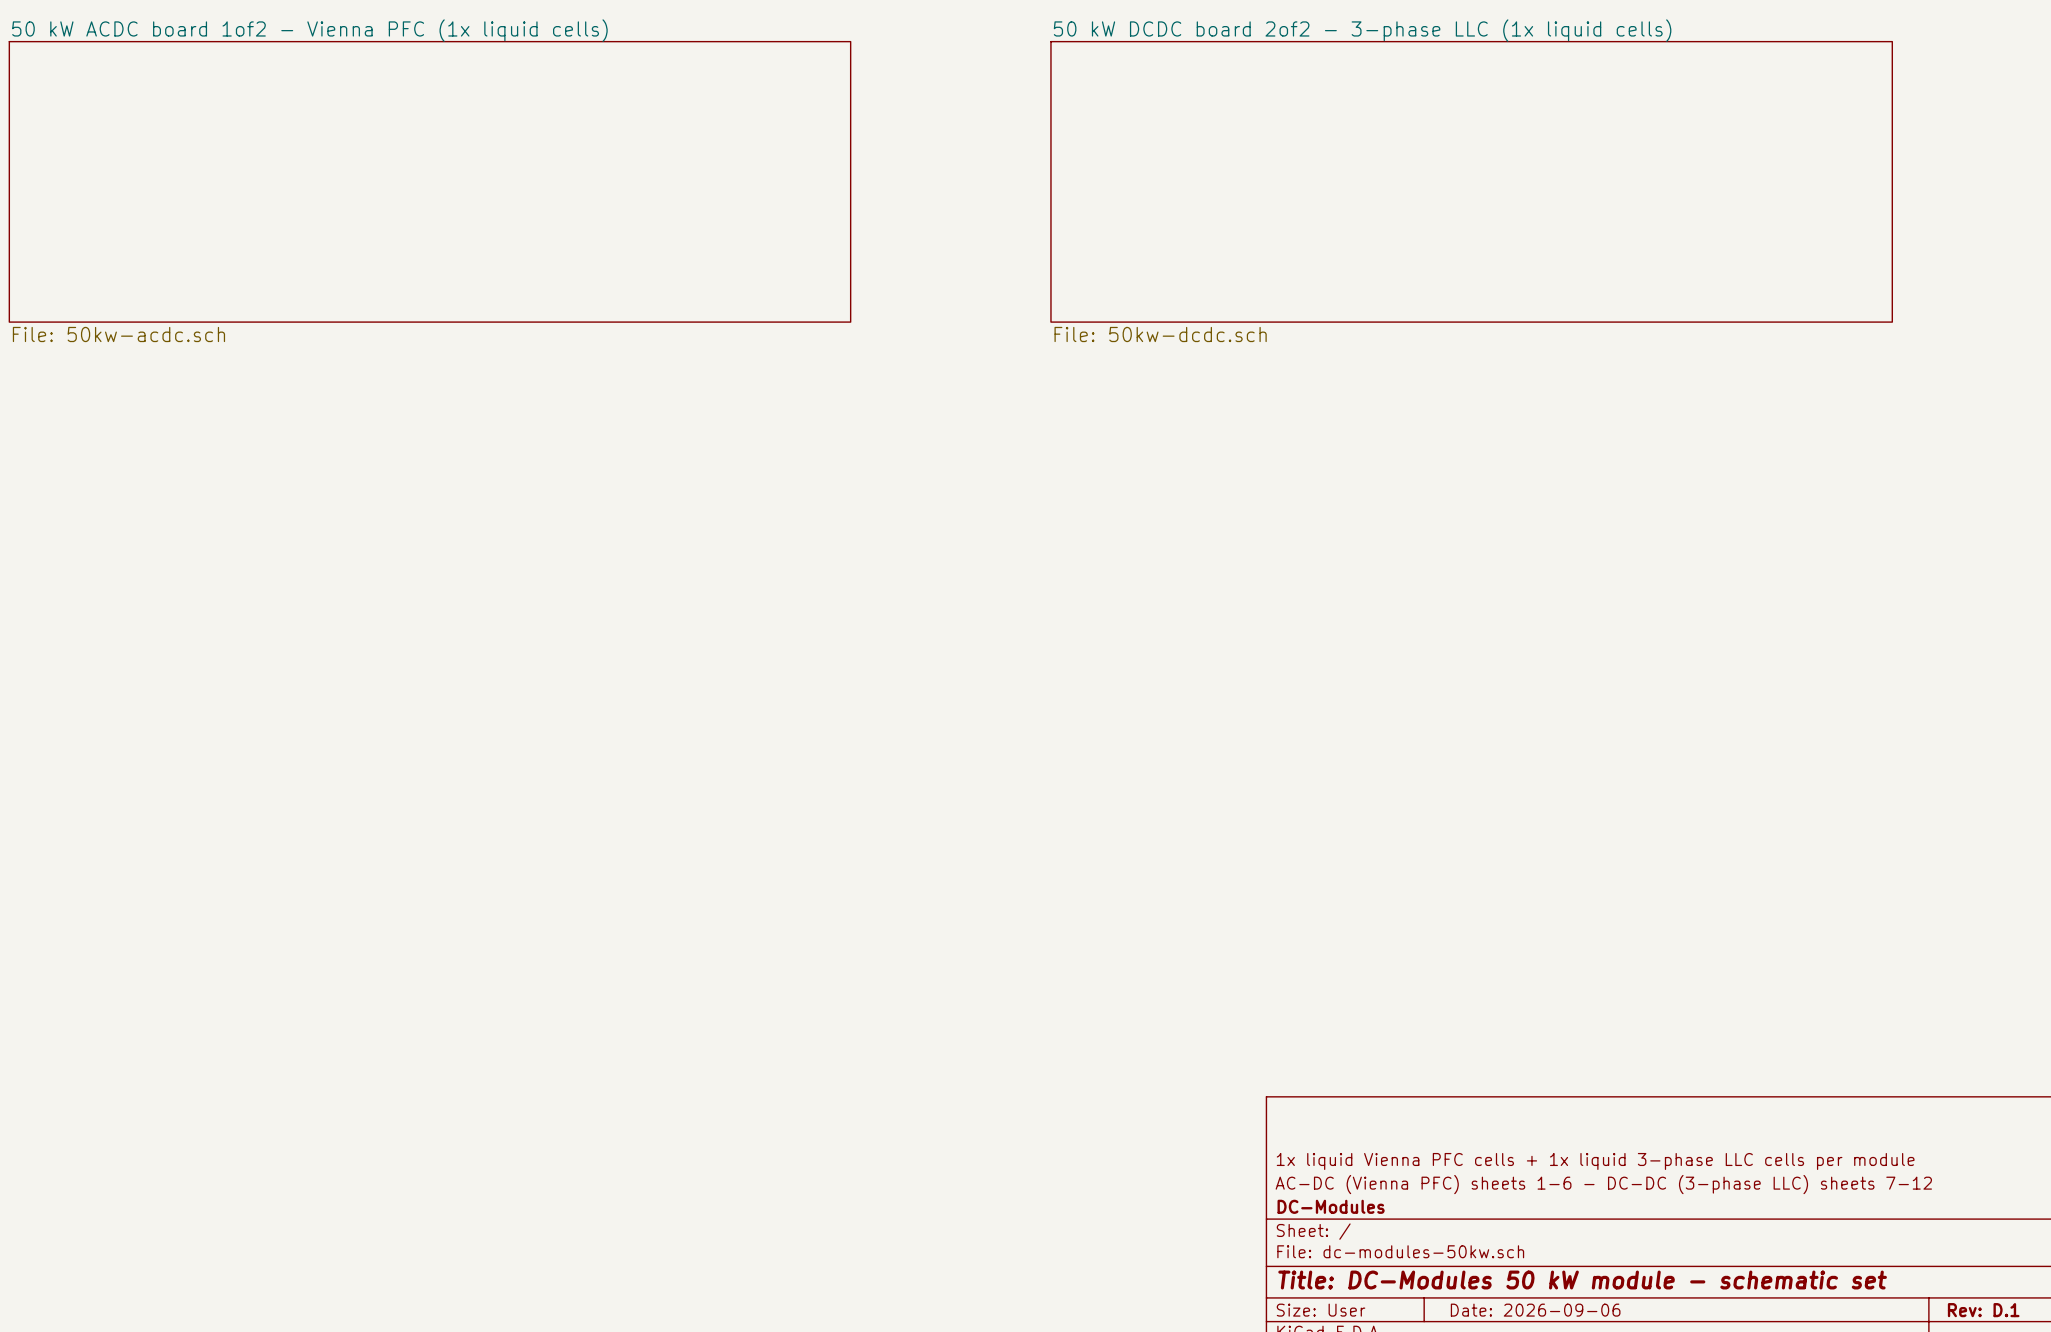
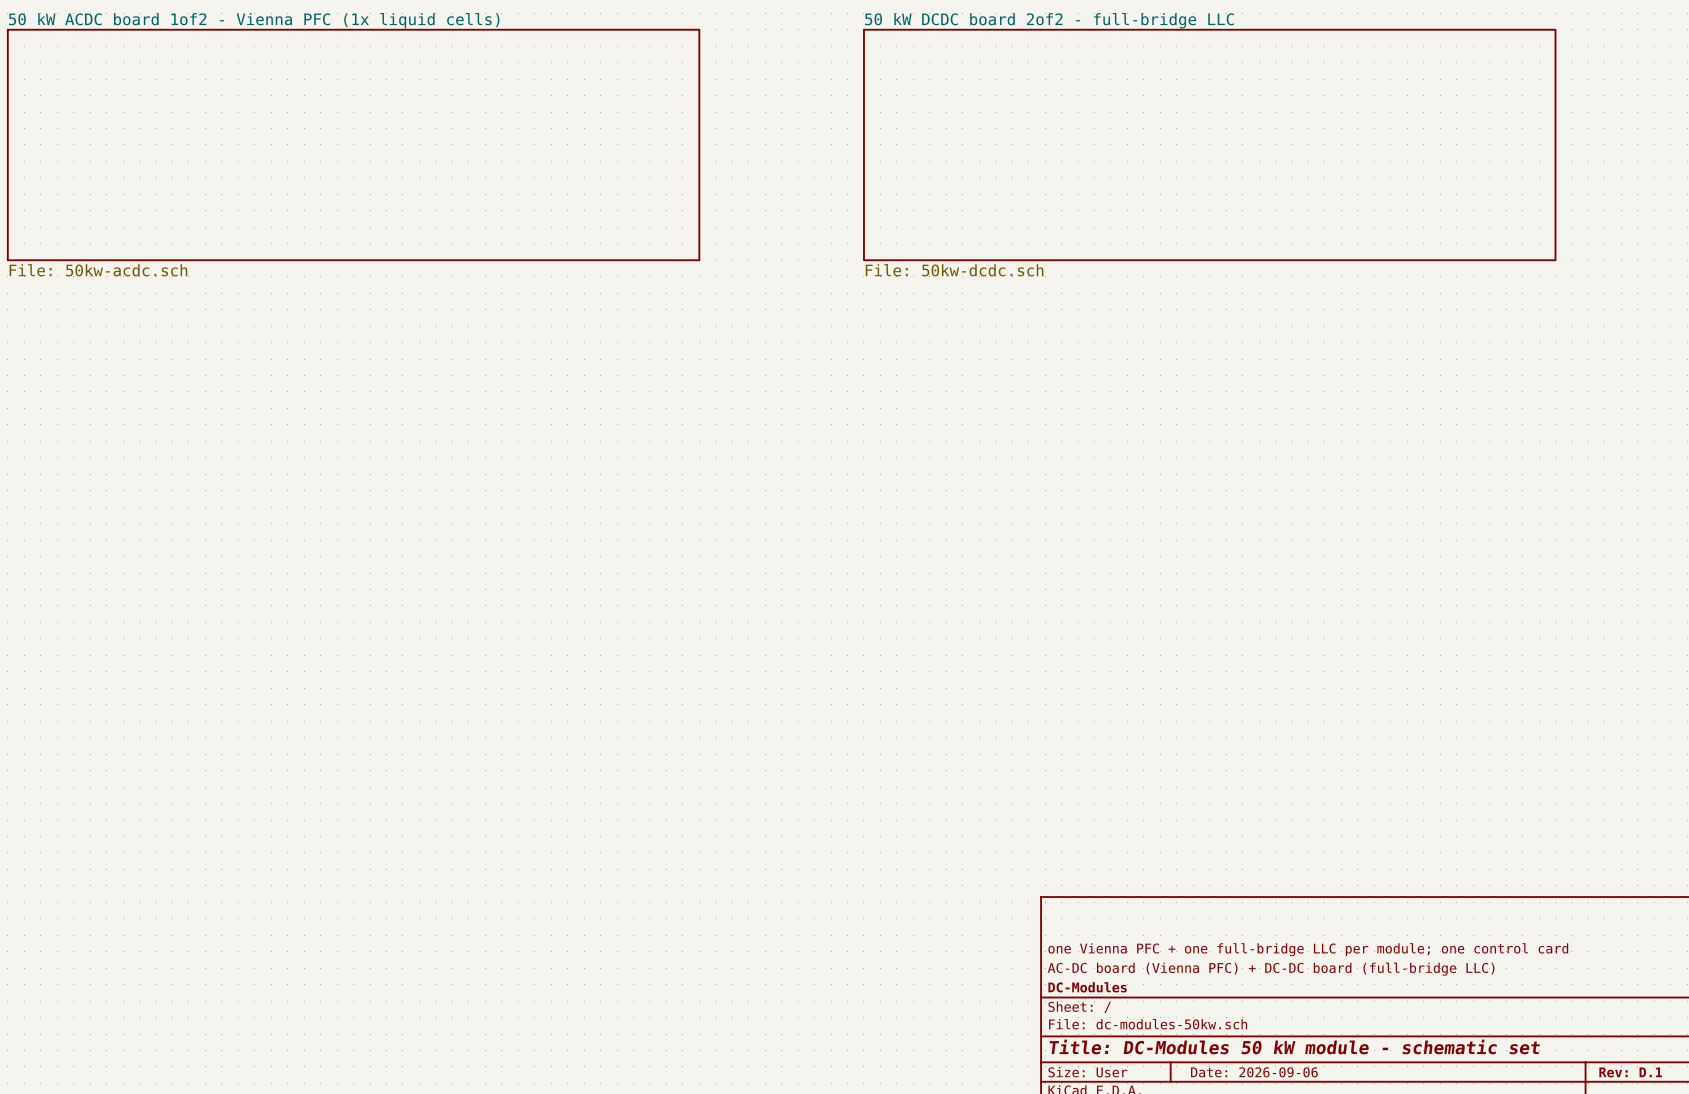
sheet 50 kW DCDC board 2of2 - 3-phase LLC (1x liquid cells) name: 50 kW DCDC board 2of2 - 3-phase LLC (1x liquid cells) (1362, 30) -> 50 kW DCDC board 2of2 - full-bridge LLC (1049, 20)
title block: 1x liquid Vienna PFC cells + 1x liquid 3-phase LLC cells per module (1595, 1161) -> one Vienna PFC + one full-bridge LLC per module; one control card (1308, 949)
title block: AC-DC (Vienna PFC) sheets 1-6 - DC-DC (3-phase LLC) sheets 7-12 (1603, 1184) -> AC-DC board (Vienna PFC) + DC-DC board (full-bridge LLC) (1271, 969)

